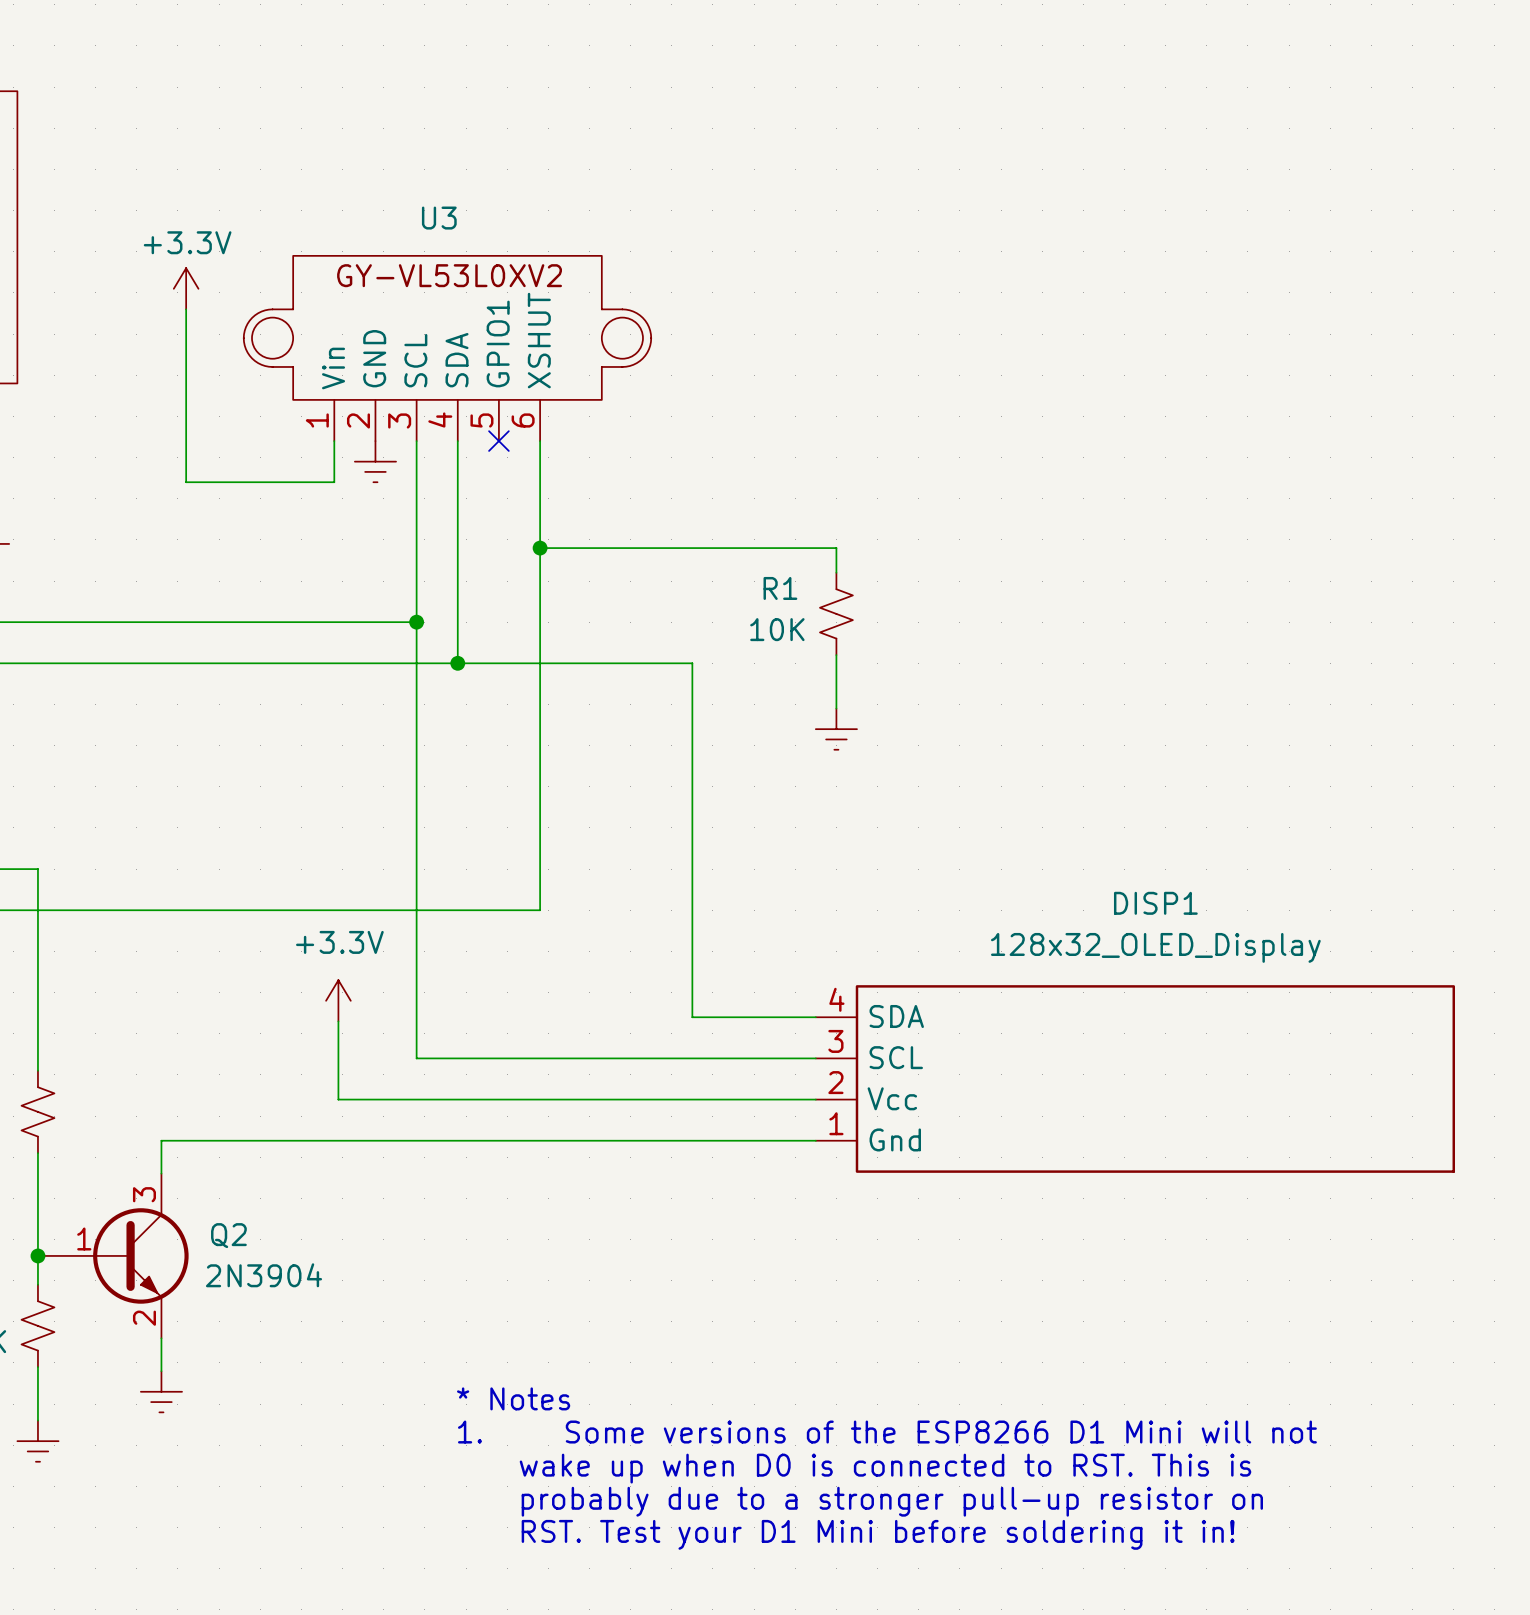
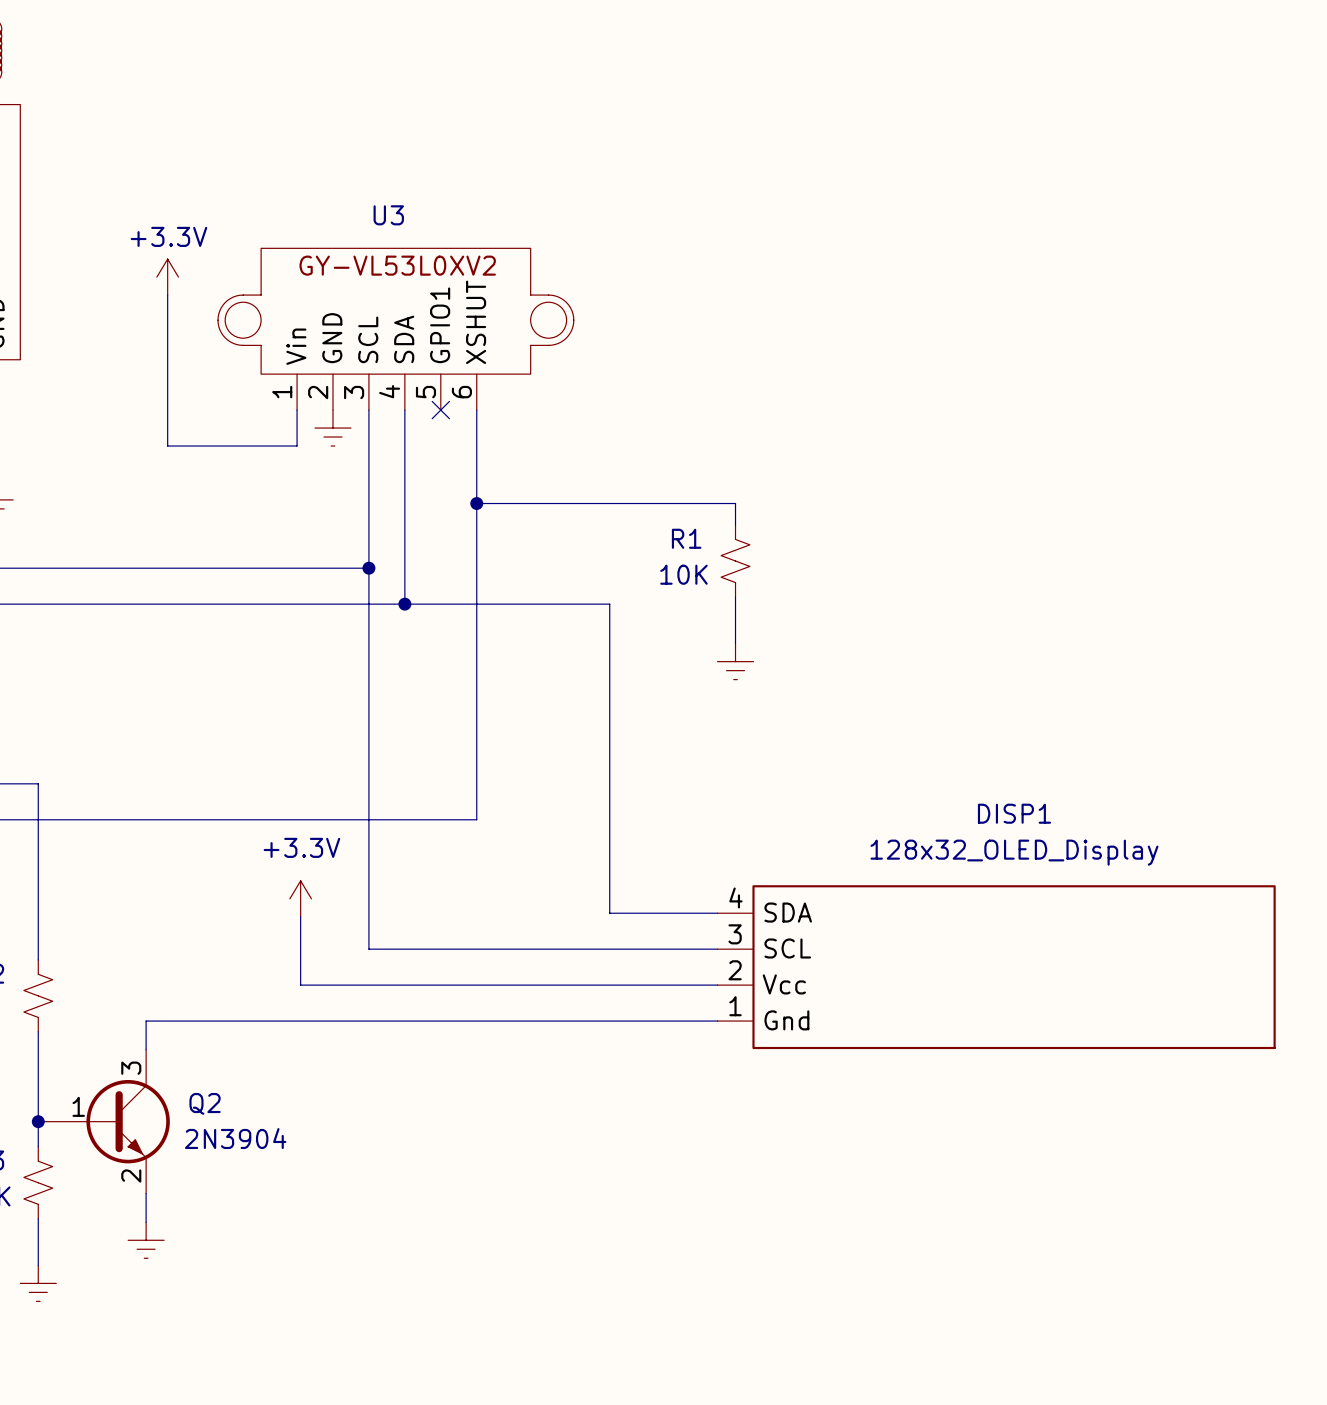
text: * Notes (513, 1398) -> none
text: 1. Some versions of the ESP8266 D1 Mini will not (887, 1432) -> none
text: wake up when D0 is connected to RST. This is (885, 1468) -> none
text: probably due to a stronger pull-up resistor on (892, 1501) -> none
text: RST. Test your D1 Mini before soldering it in! (878, 1534) -> none

